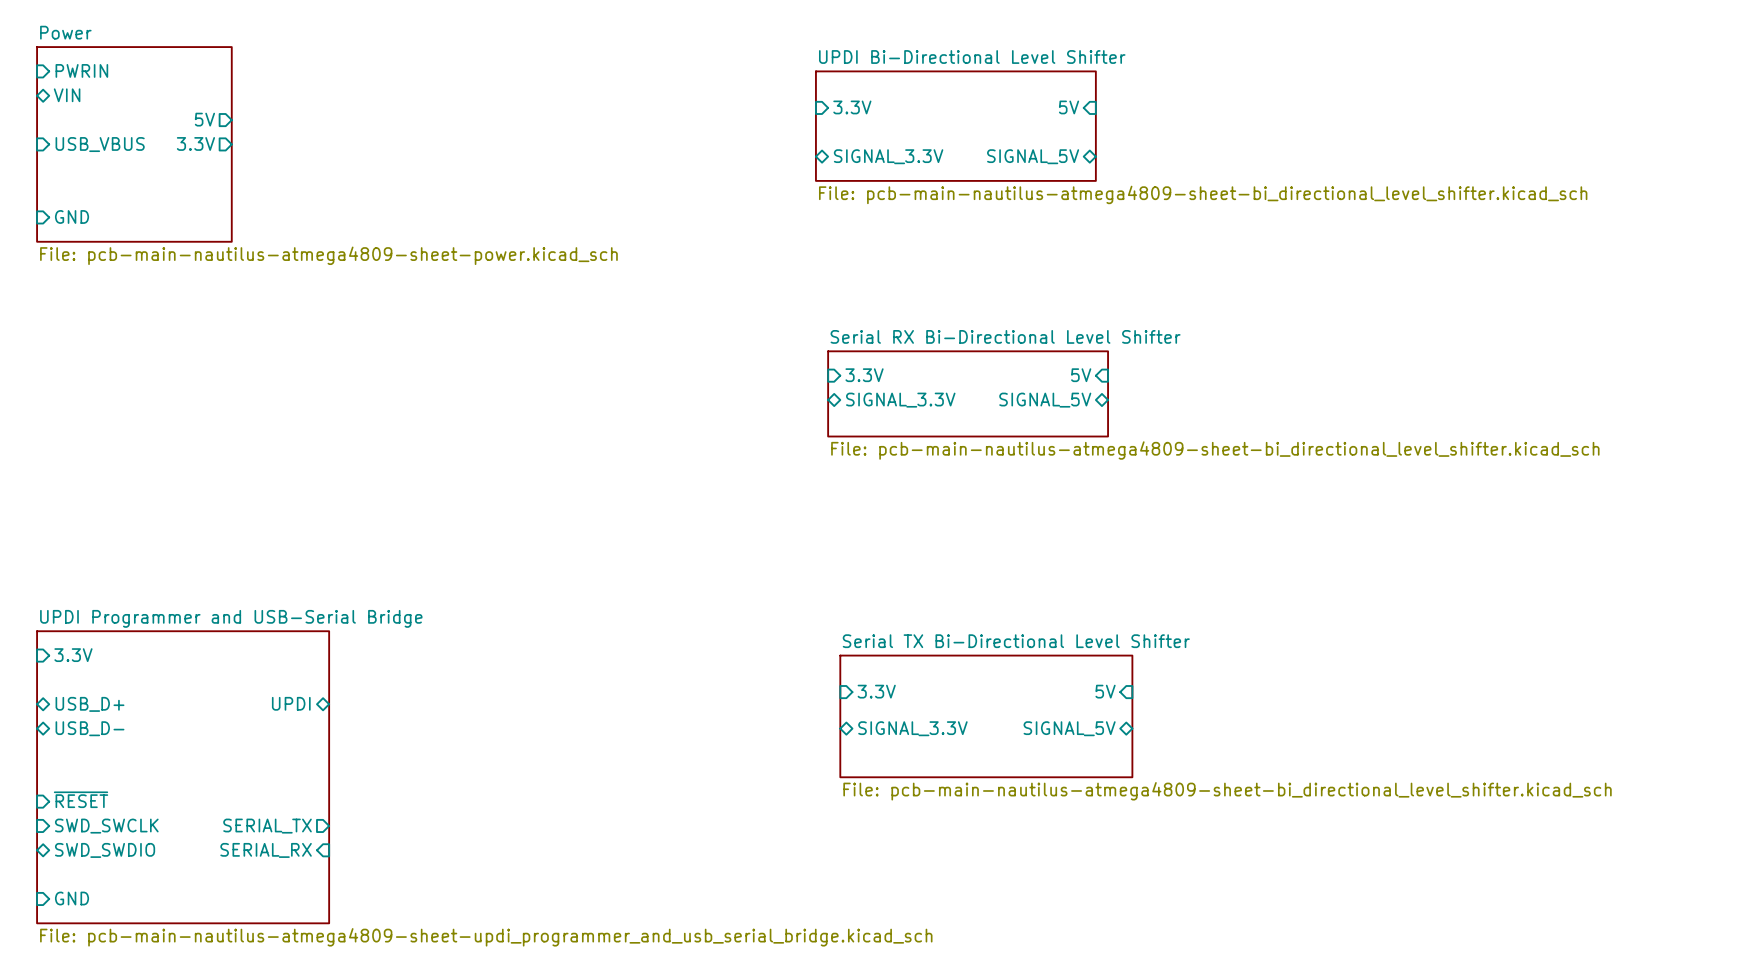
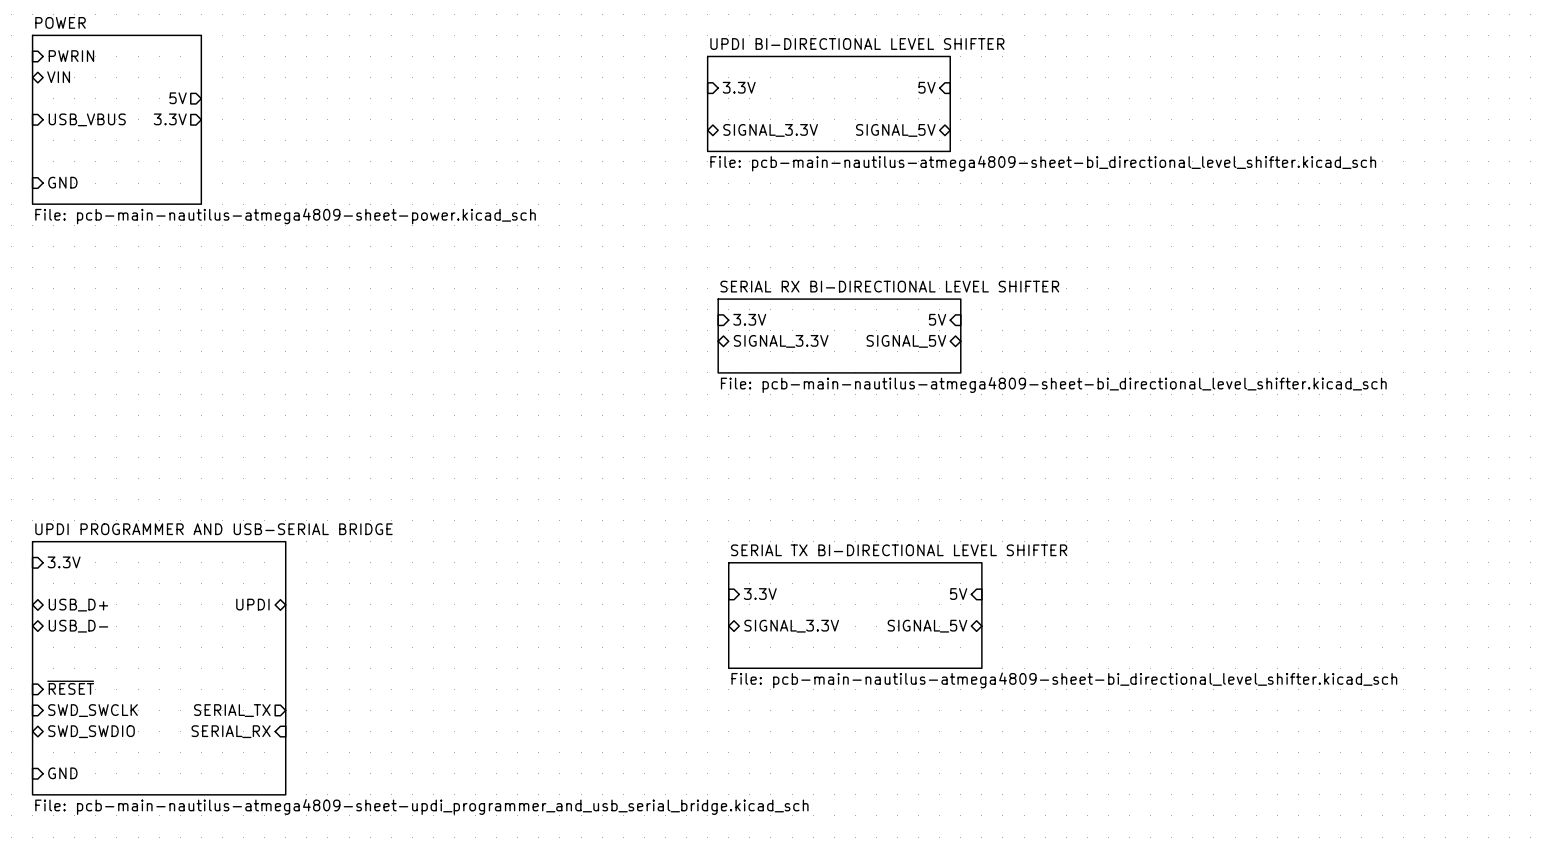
sheet Power name: Power (65, 32) -> POWER (60, 22)
sheet UPDI Bi-Directional Level Shifter name: UPDI Bi-Directional Level Shifter (972, 57) -> UPDI BI-DIRECTIONAL LEVEL SHIFTER (857, 44)
sheet Serial RX Bi-Directional Level Shifter name: Serial RX Bi-Directional Level Shifter (1005, 336) -> SERIAL RX BI-DIRECTIONAL LEVEL SHIFTER (889, 286)
sheet UPDI Programmer and USB-Serial Bridge name: UPDI Programmer and USB-Serial Bridge (231, 618) -> UPDI PROGRAMMER AND USB-SERIAL BRIDGE (213, 529)
sheet Serial TX Bi-Directional Level Shifter name: Serial TX Bi-Directional Level Shifter (1016, 641) -> SERIAL TX BI-DIRECTIONAL LEVEL SHIFTER (899, 550)

